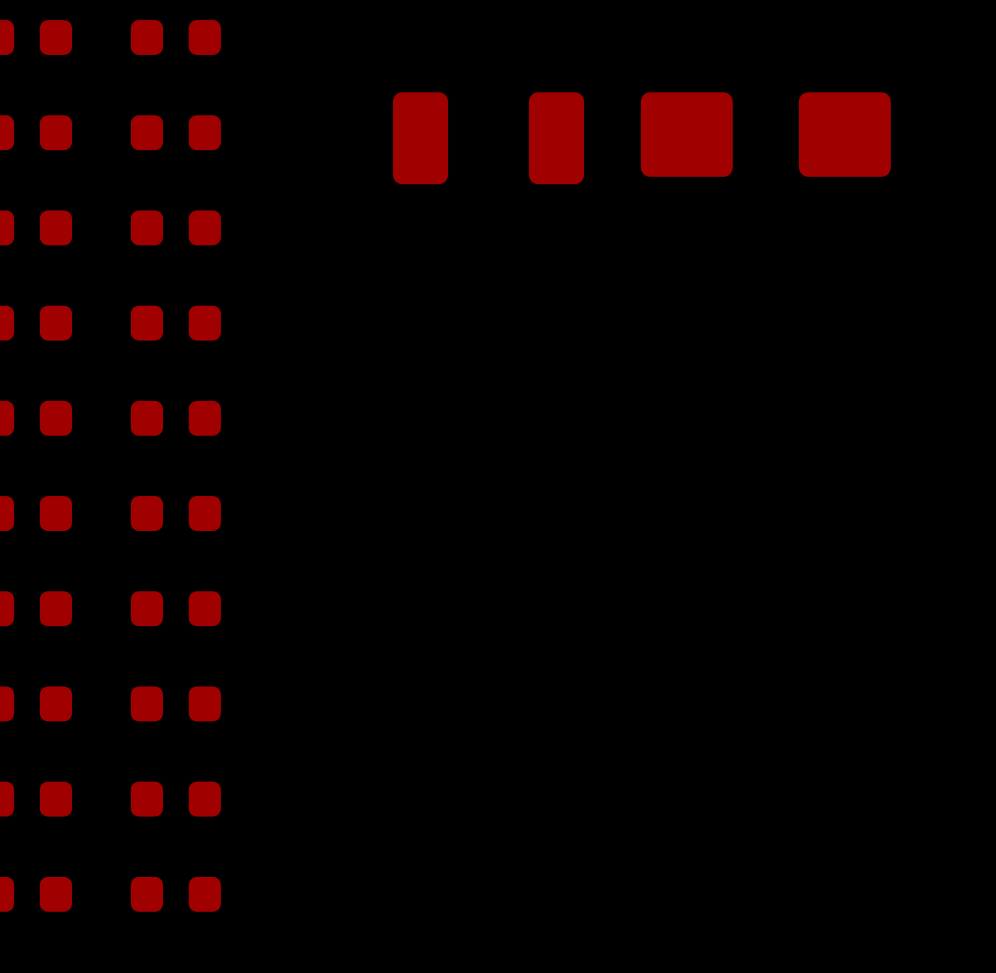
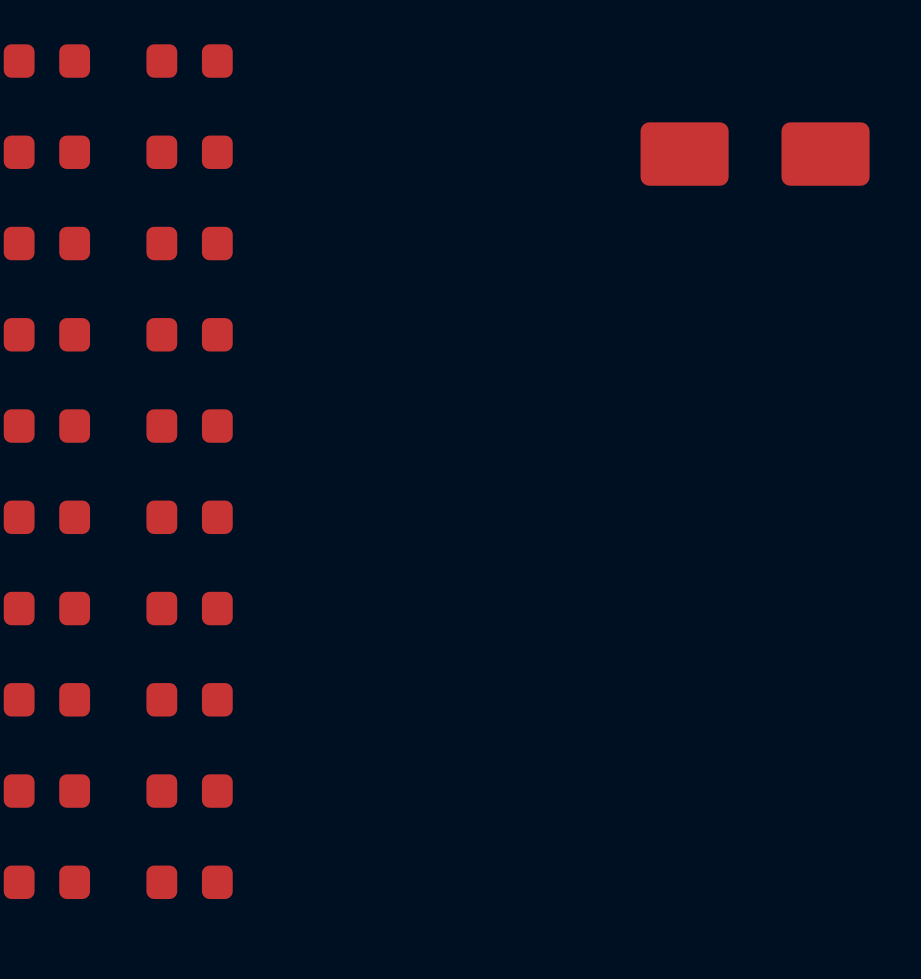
part footprint: [640, 92, 891, 177] -> [640, 122, 870, 186]
part: (488, 138) -> none

